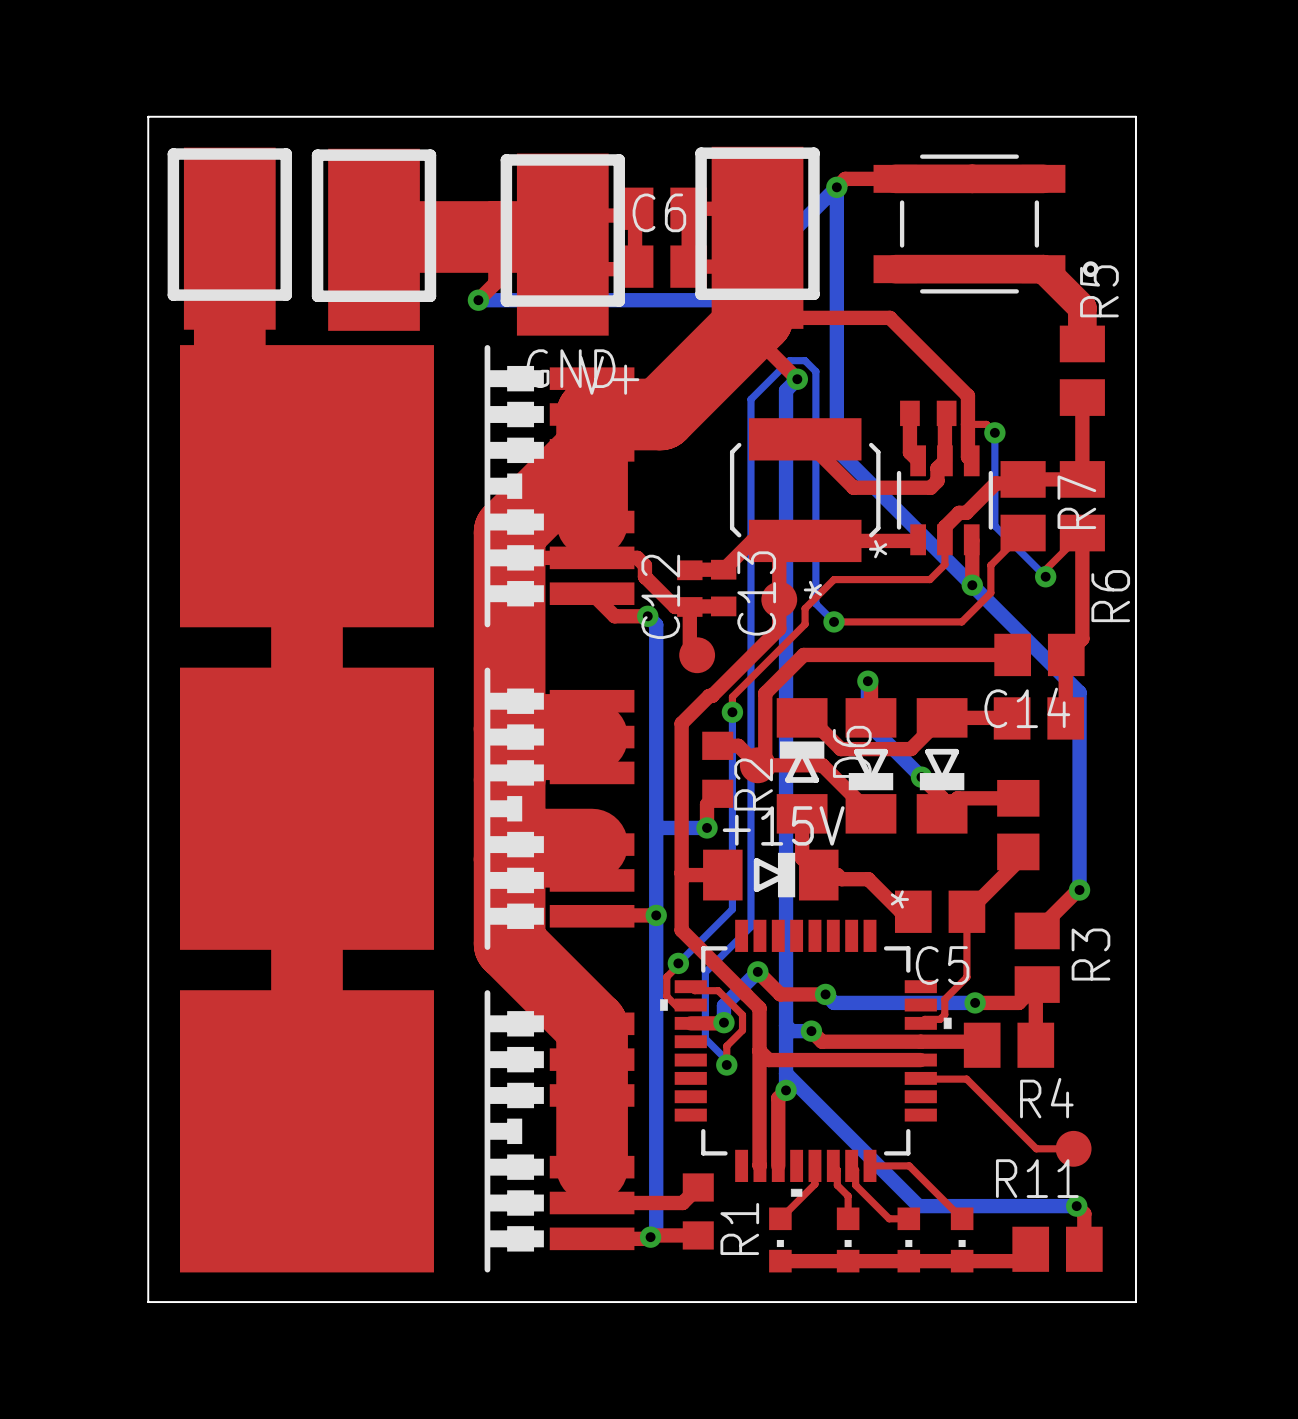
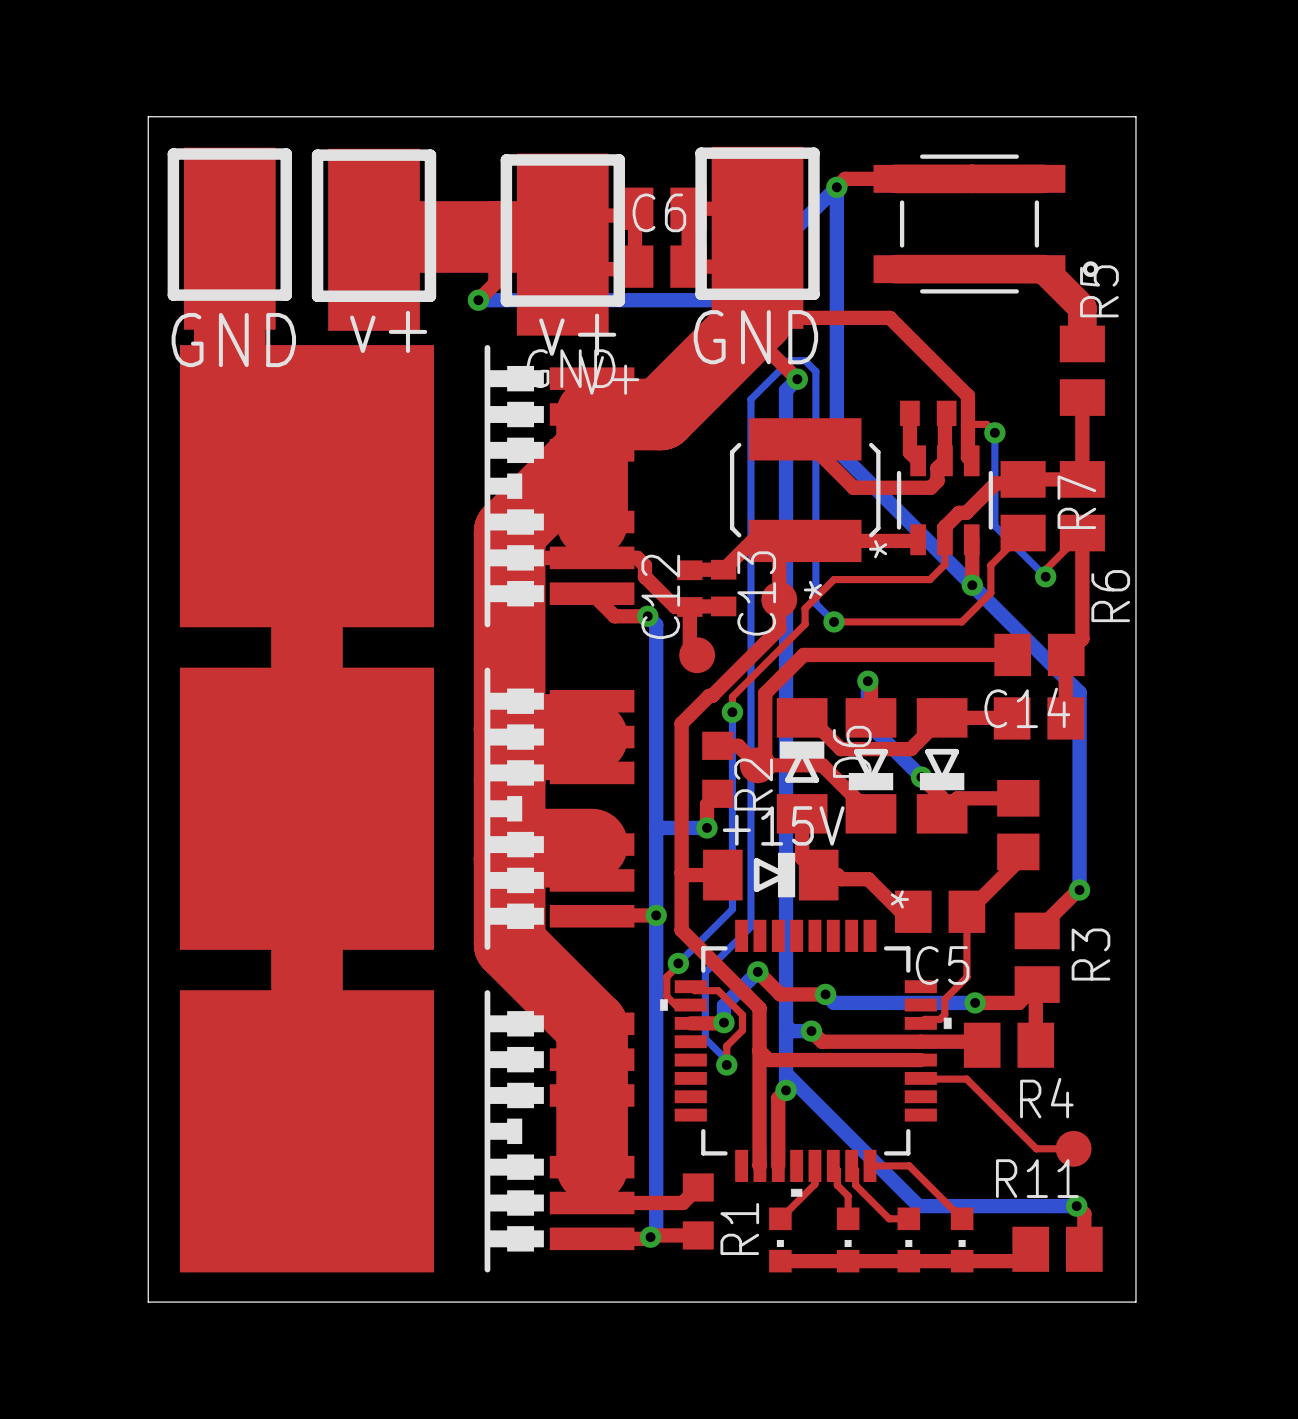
text: none -> v+ (388, 331)
text: none -> v+ (577, 334)
text: none -> GND (755, 337)
text: none -> GND (233, 340)

